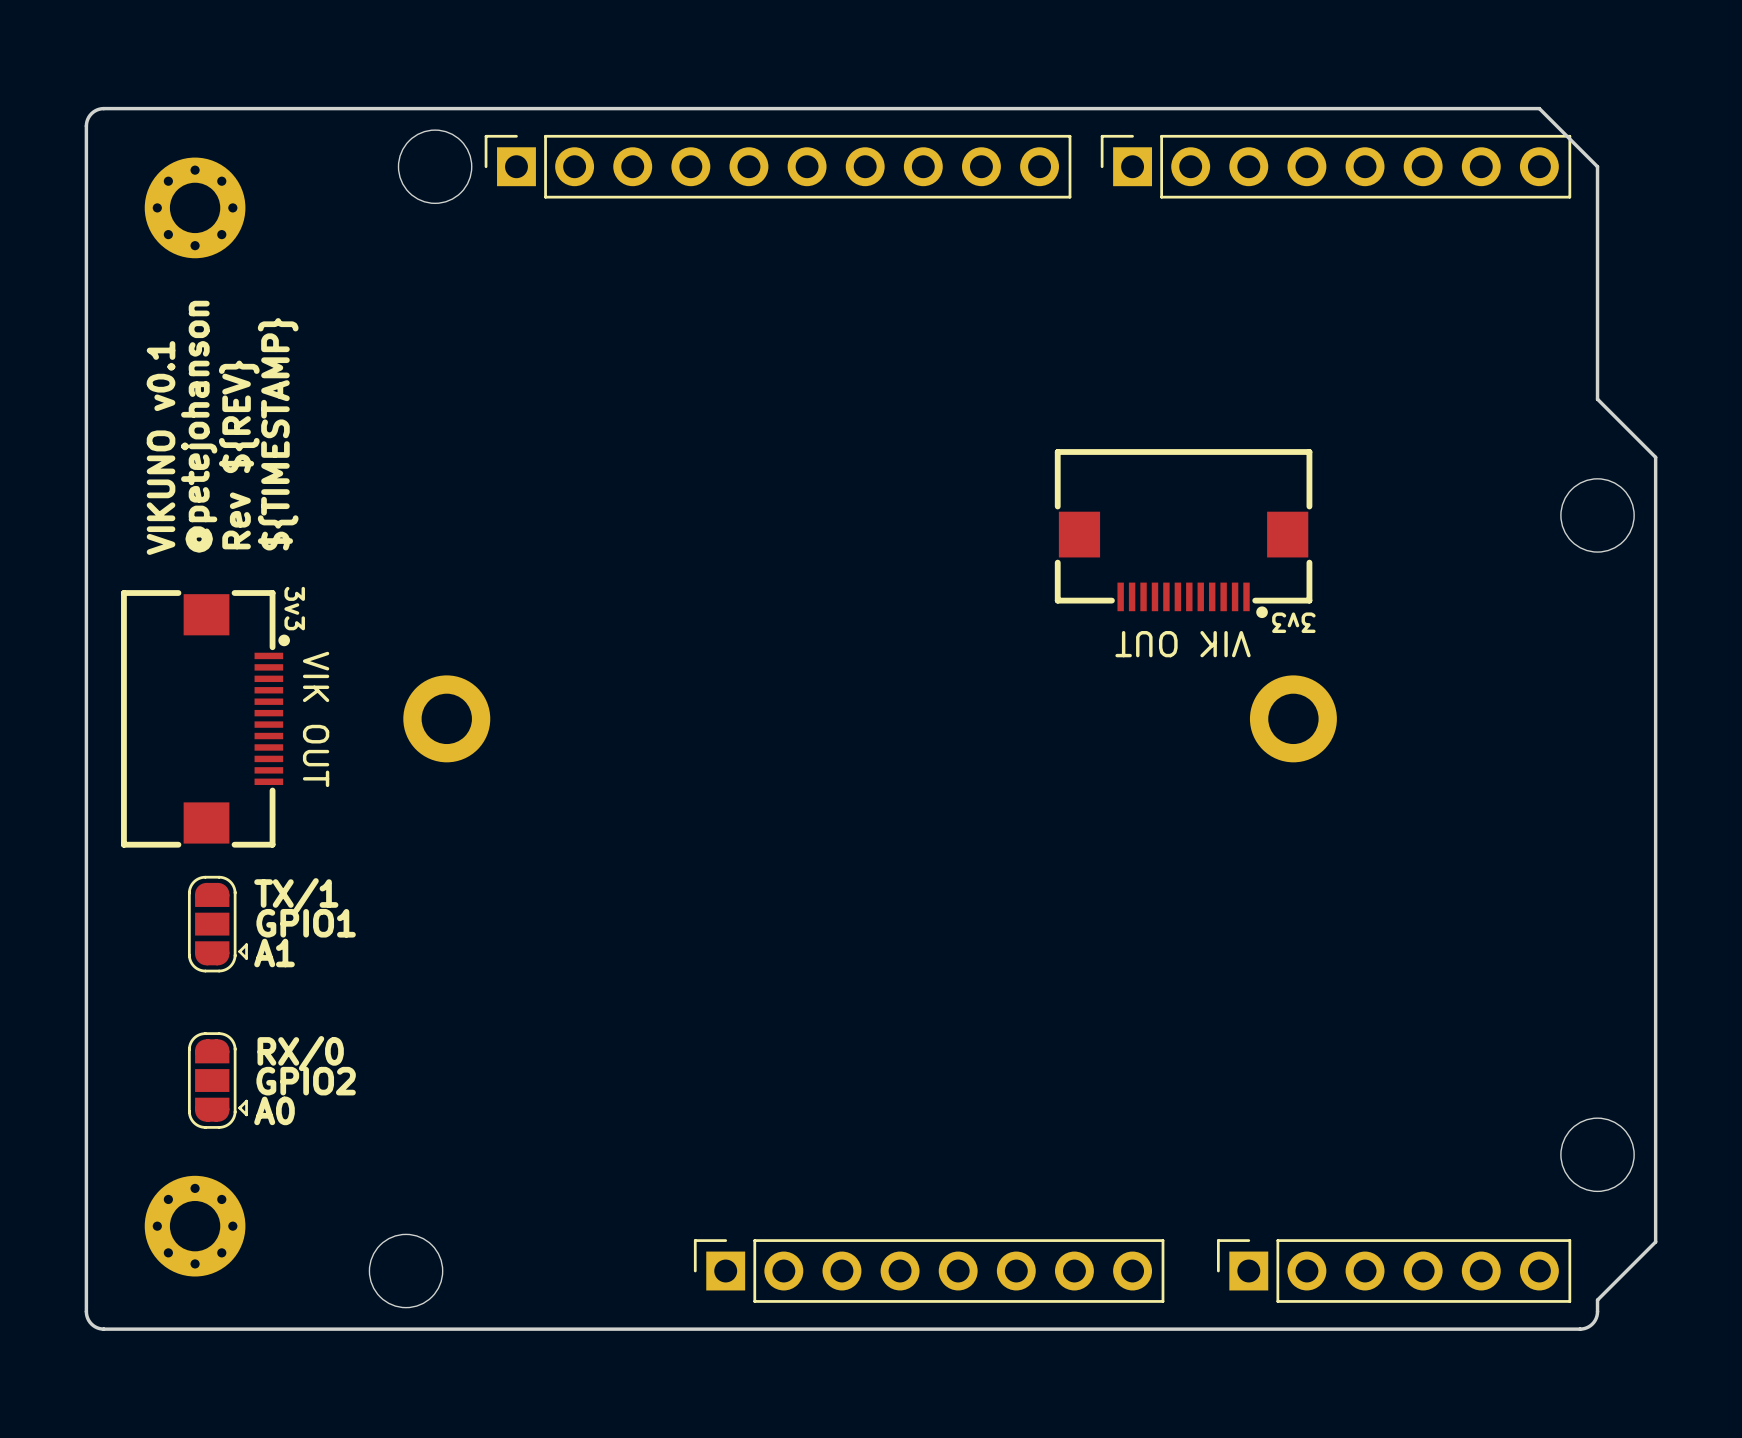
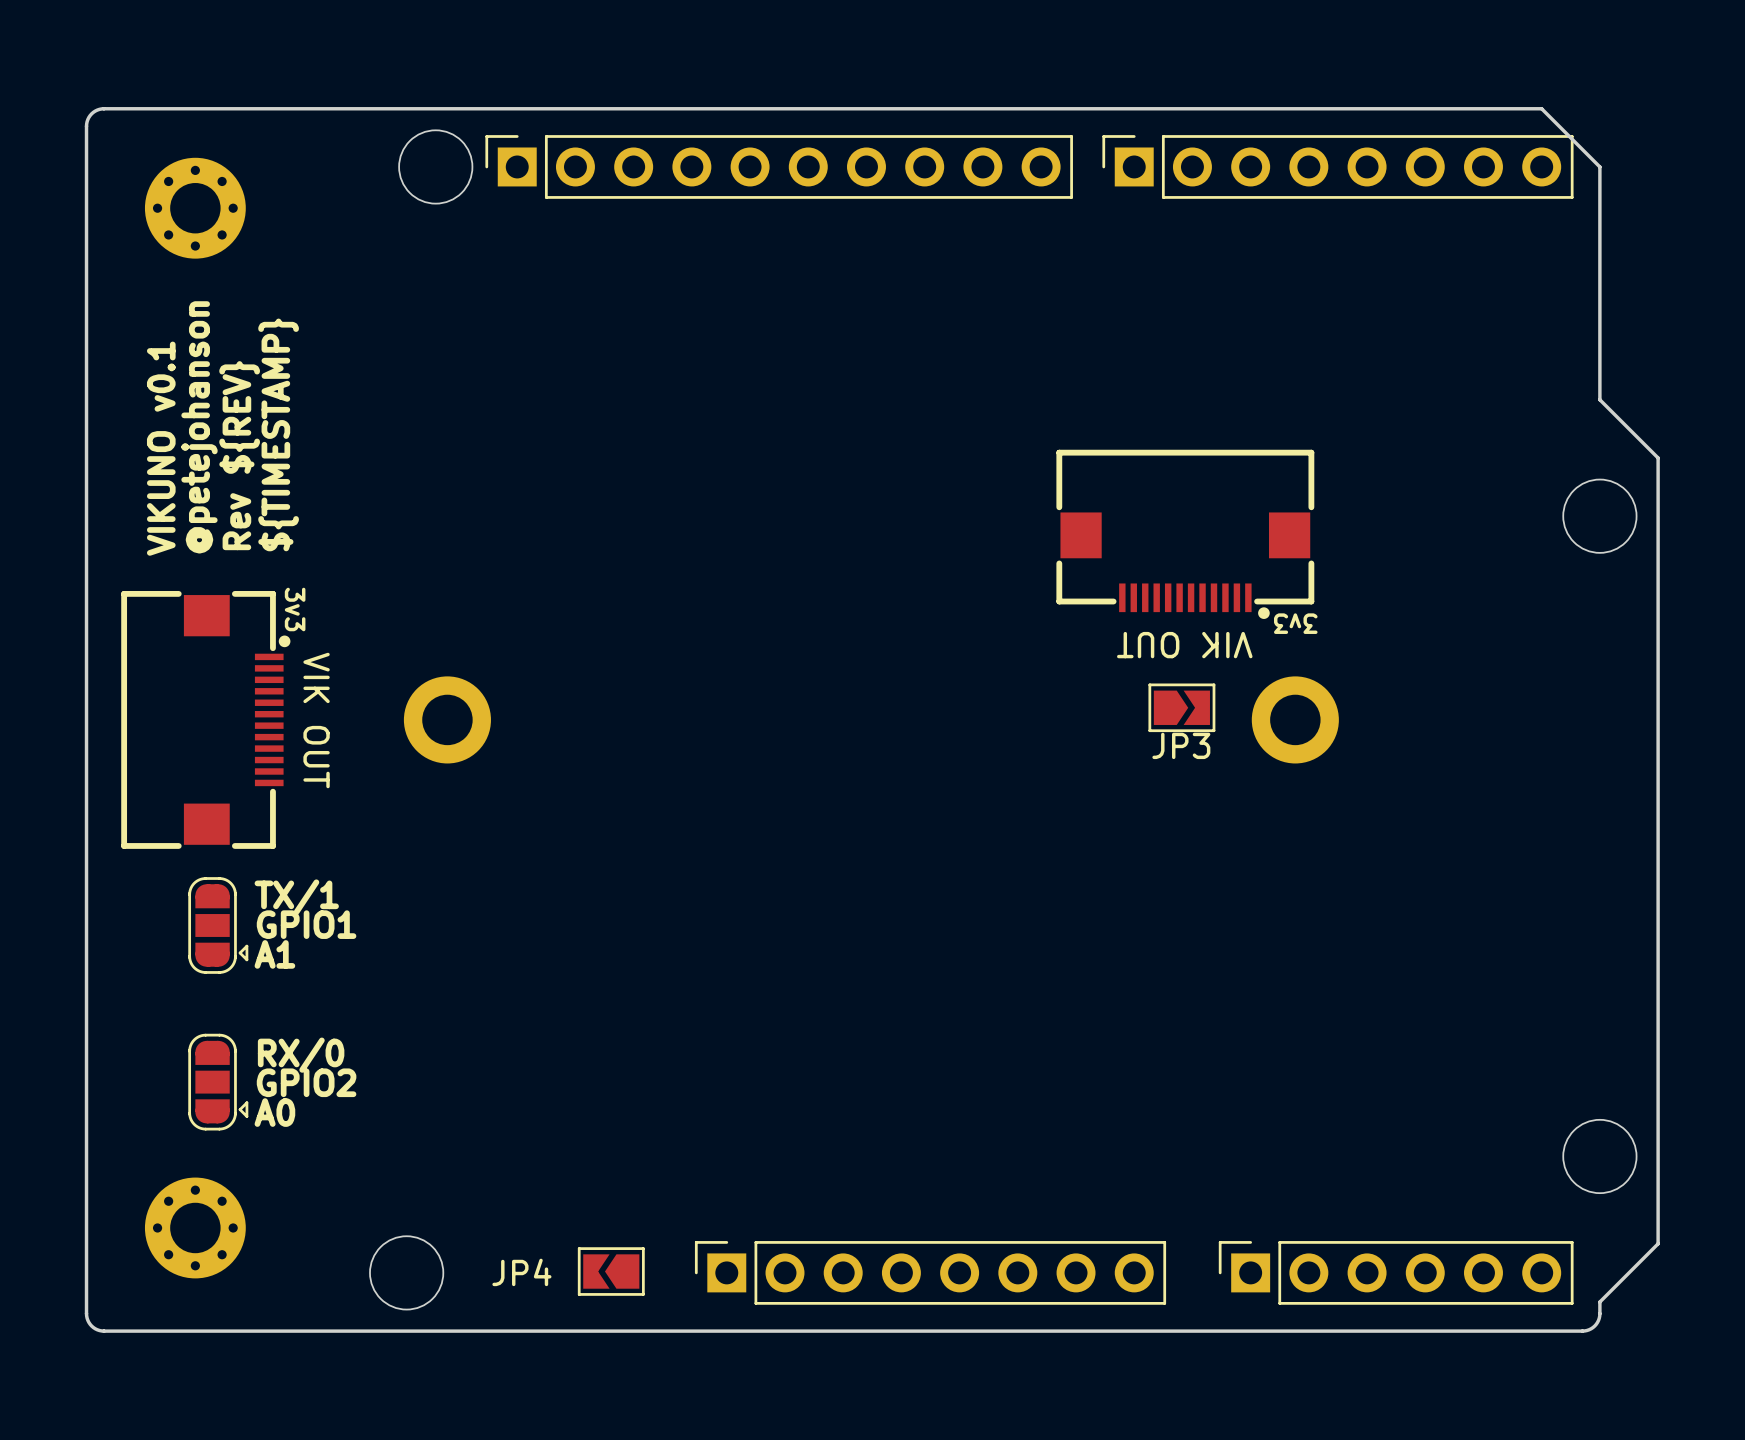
JP3: none -> (1181, 707)
JP4: none -> (611, 1271)

